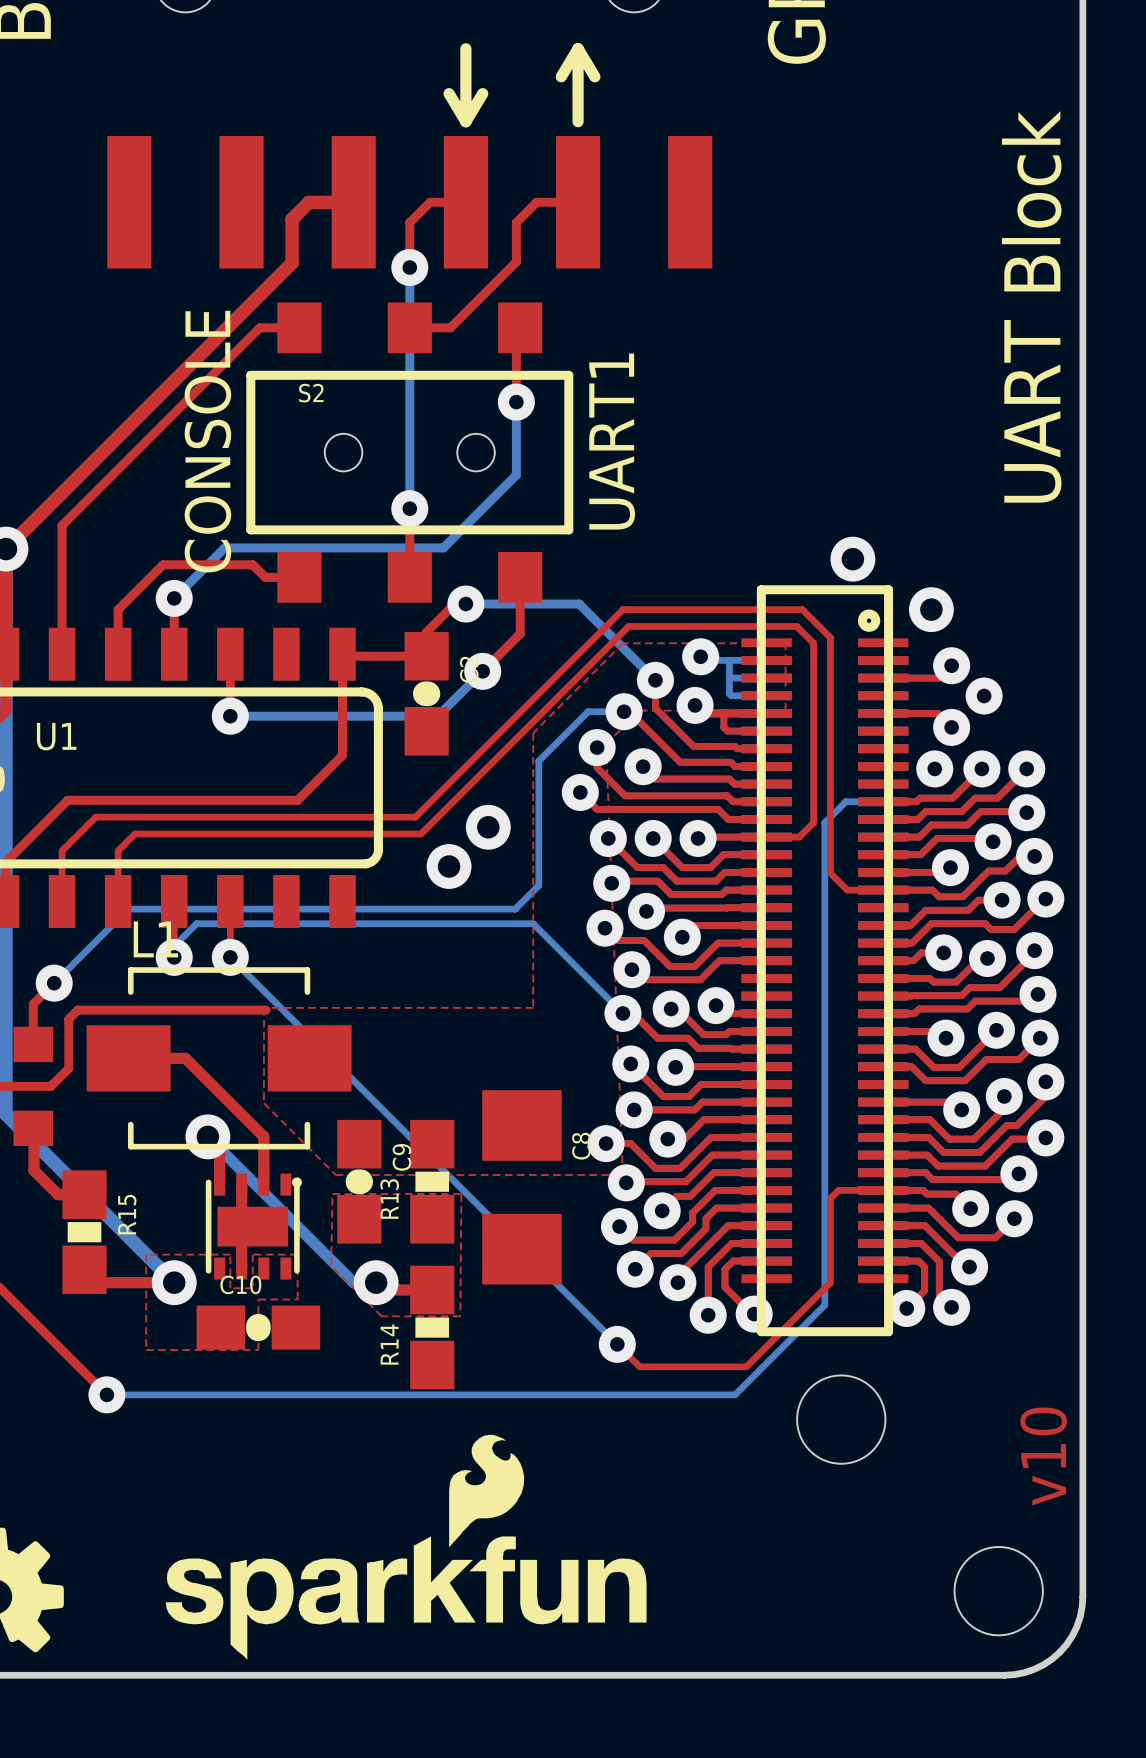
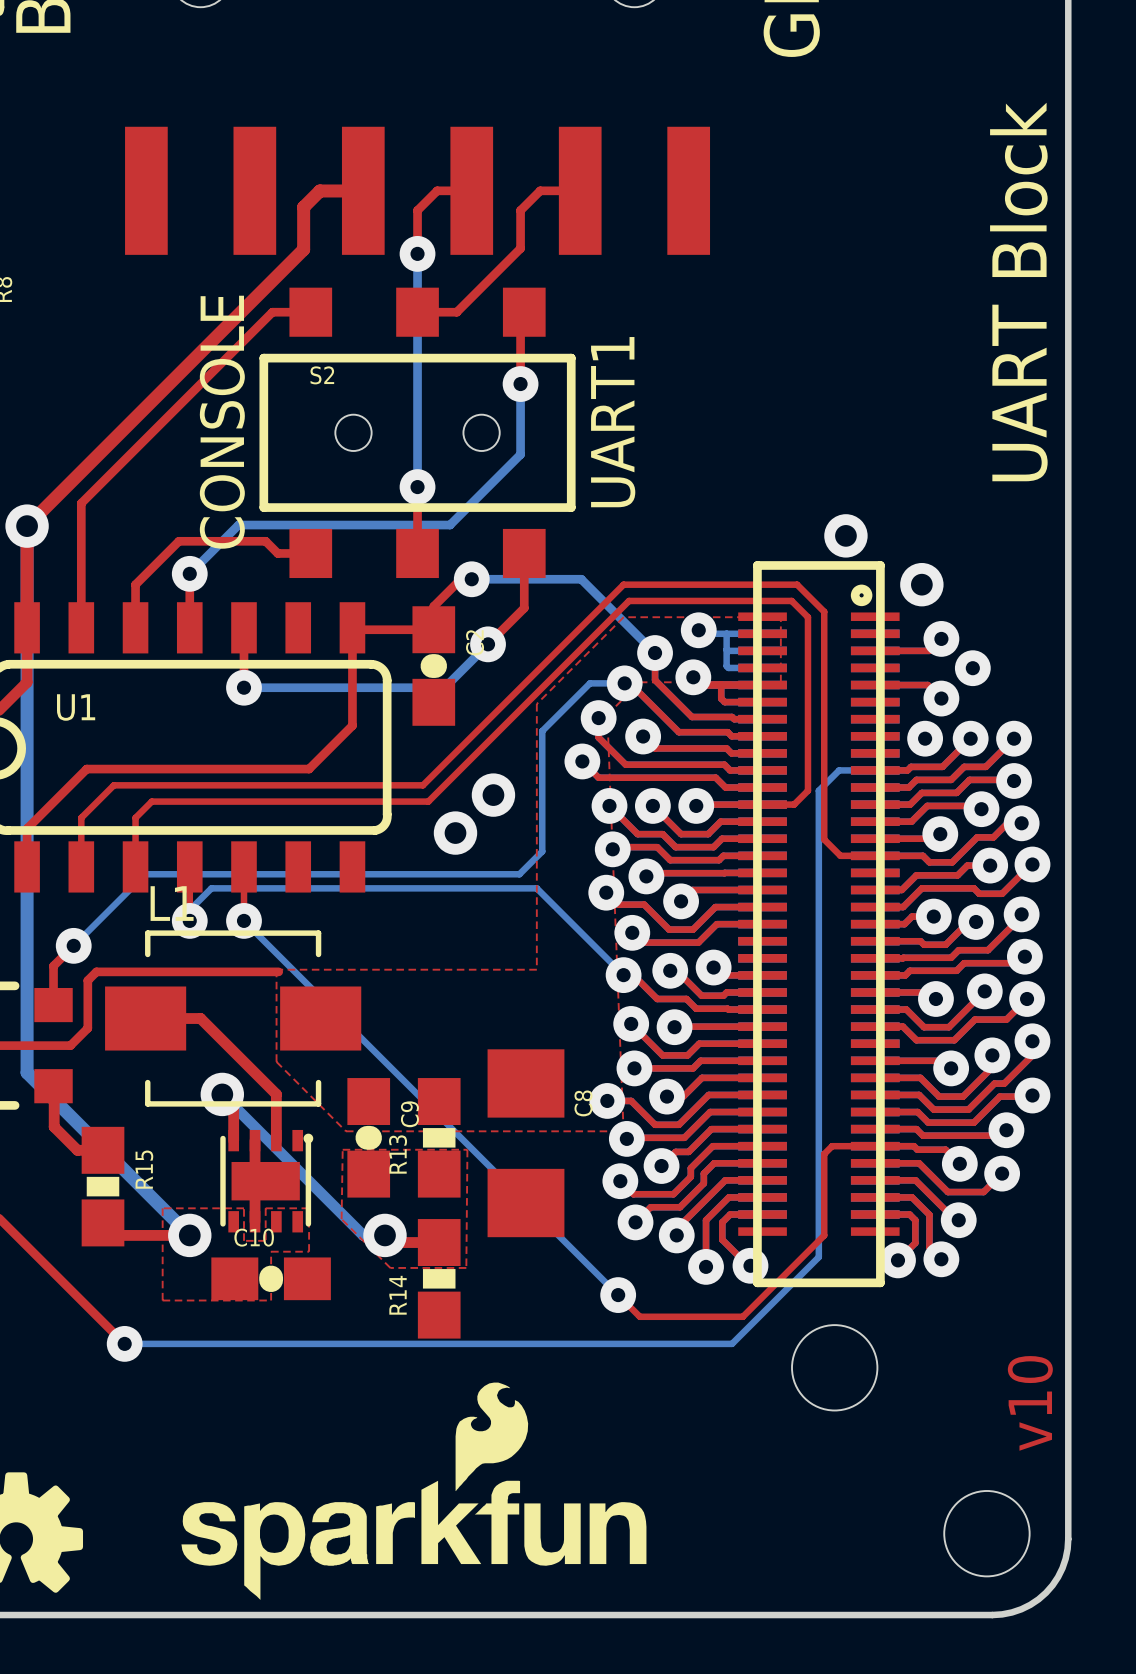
line: (465, 48) (465, 121) -> none
line: (578, 48) (578, 121) -> none
line: (578, 48) (561, 76) -> none
line: (578, 48) (594, 76) -> none
line: (449, 93) (465, 121) -> none
line: (482, 93) (465, 121) -> none

